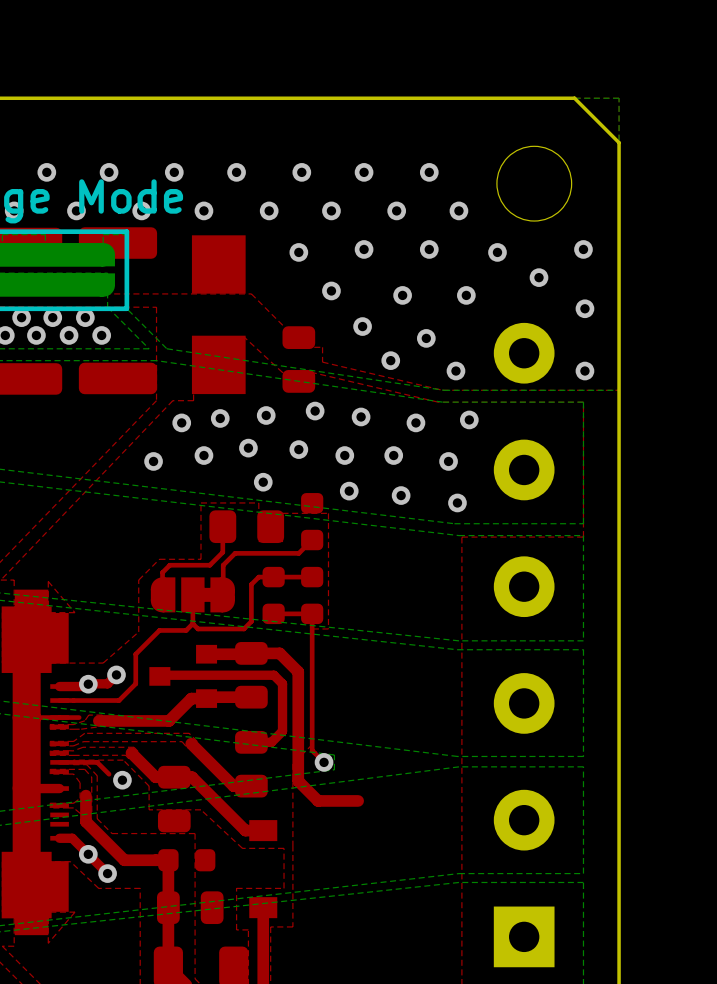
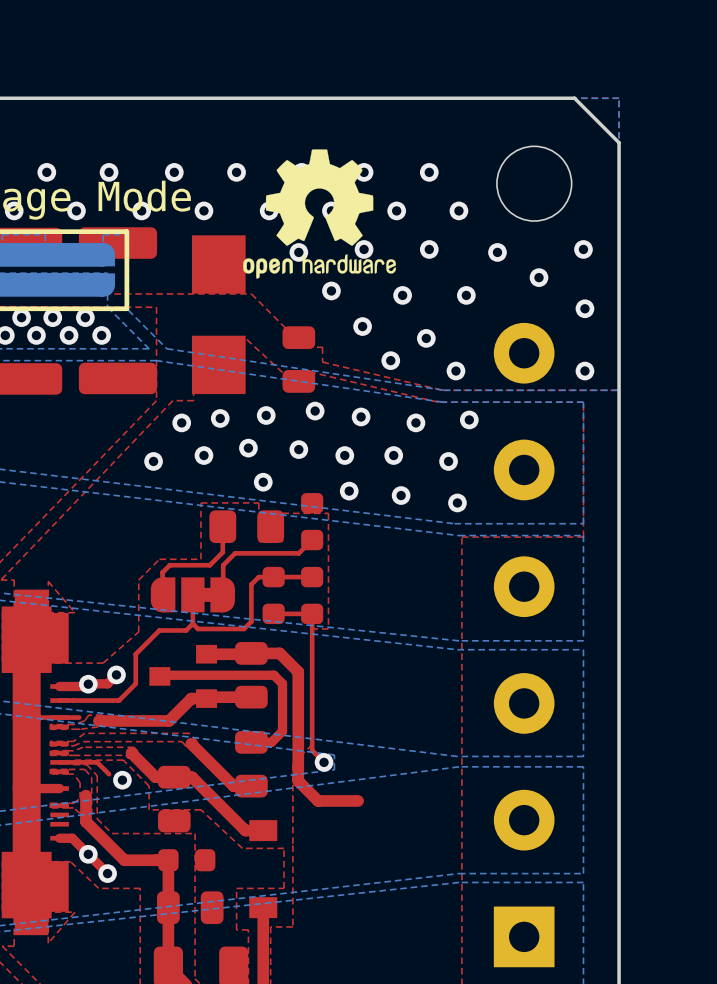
drawing: none -> [243, 149, 396, 279]

